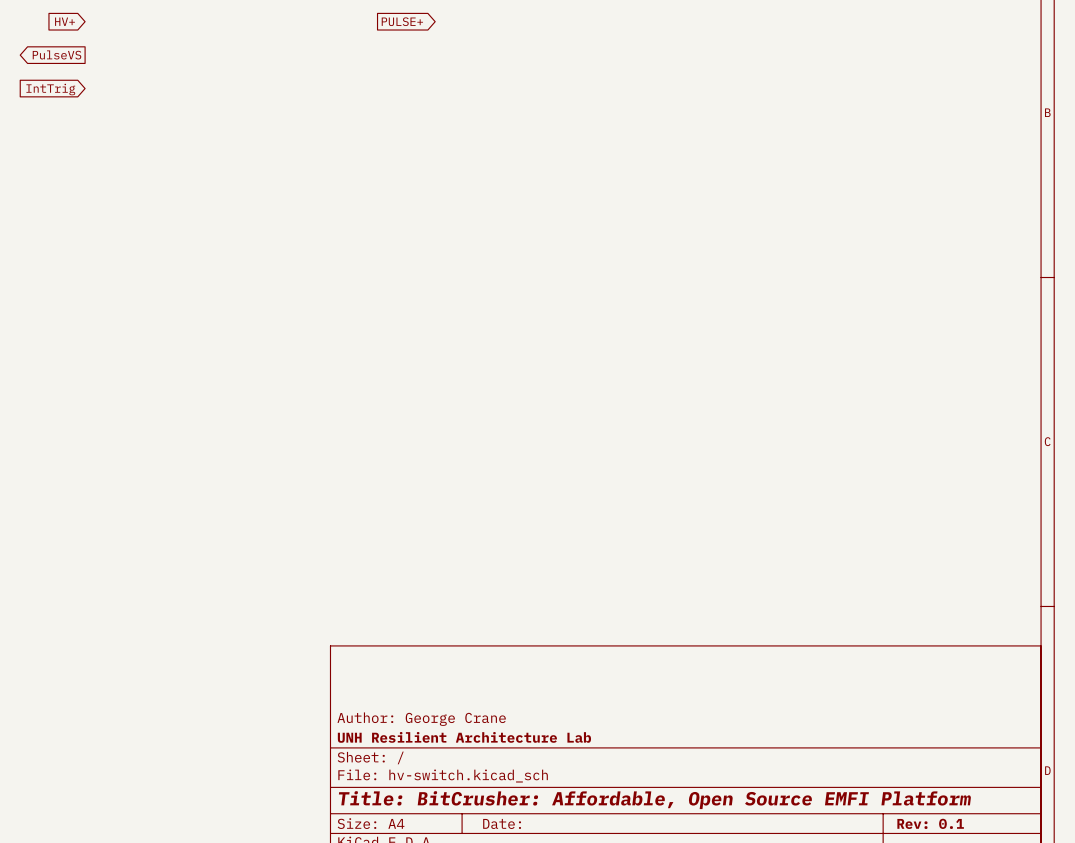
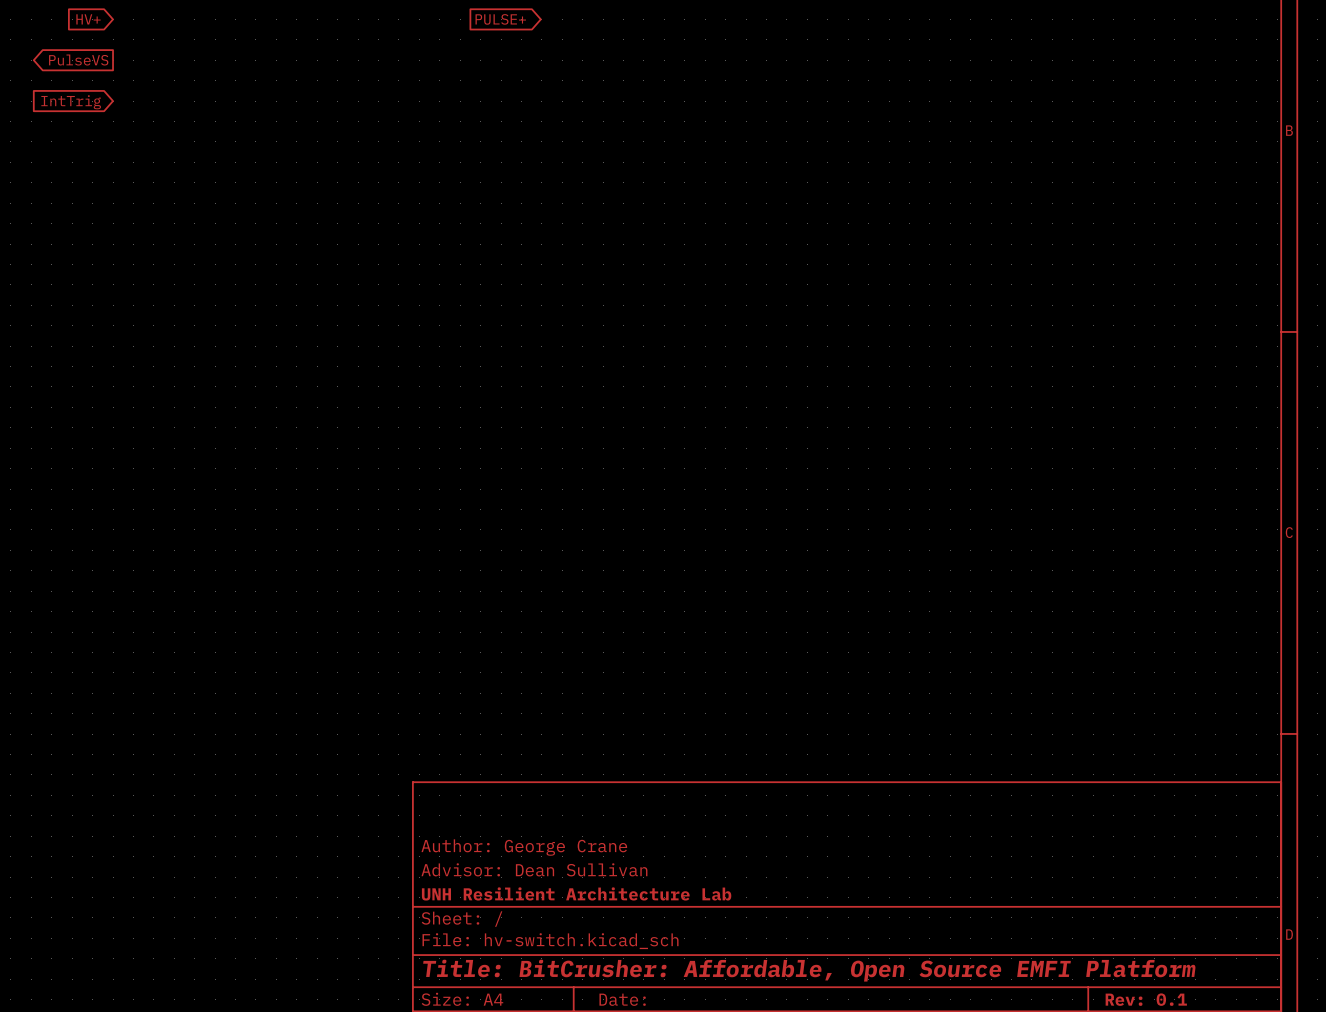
title block: none -> Author: George Crane (524, 847)
title block: Author: George Crane (421, 719) -> Advisor: Dean Sullivan (534, 869)

